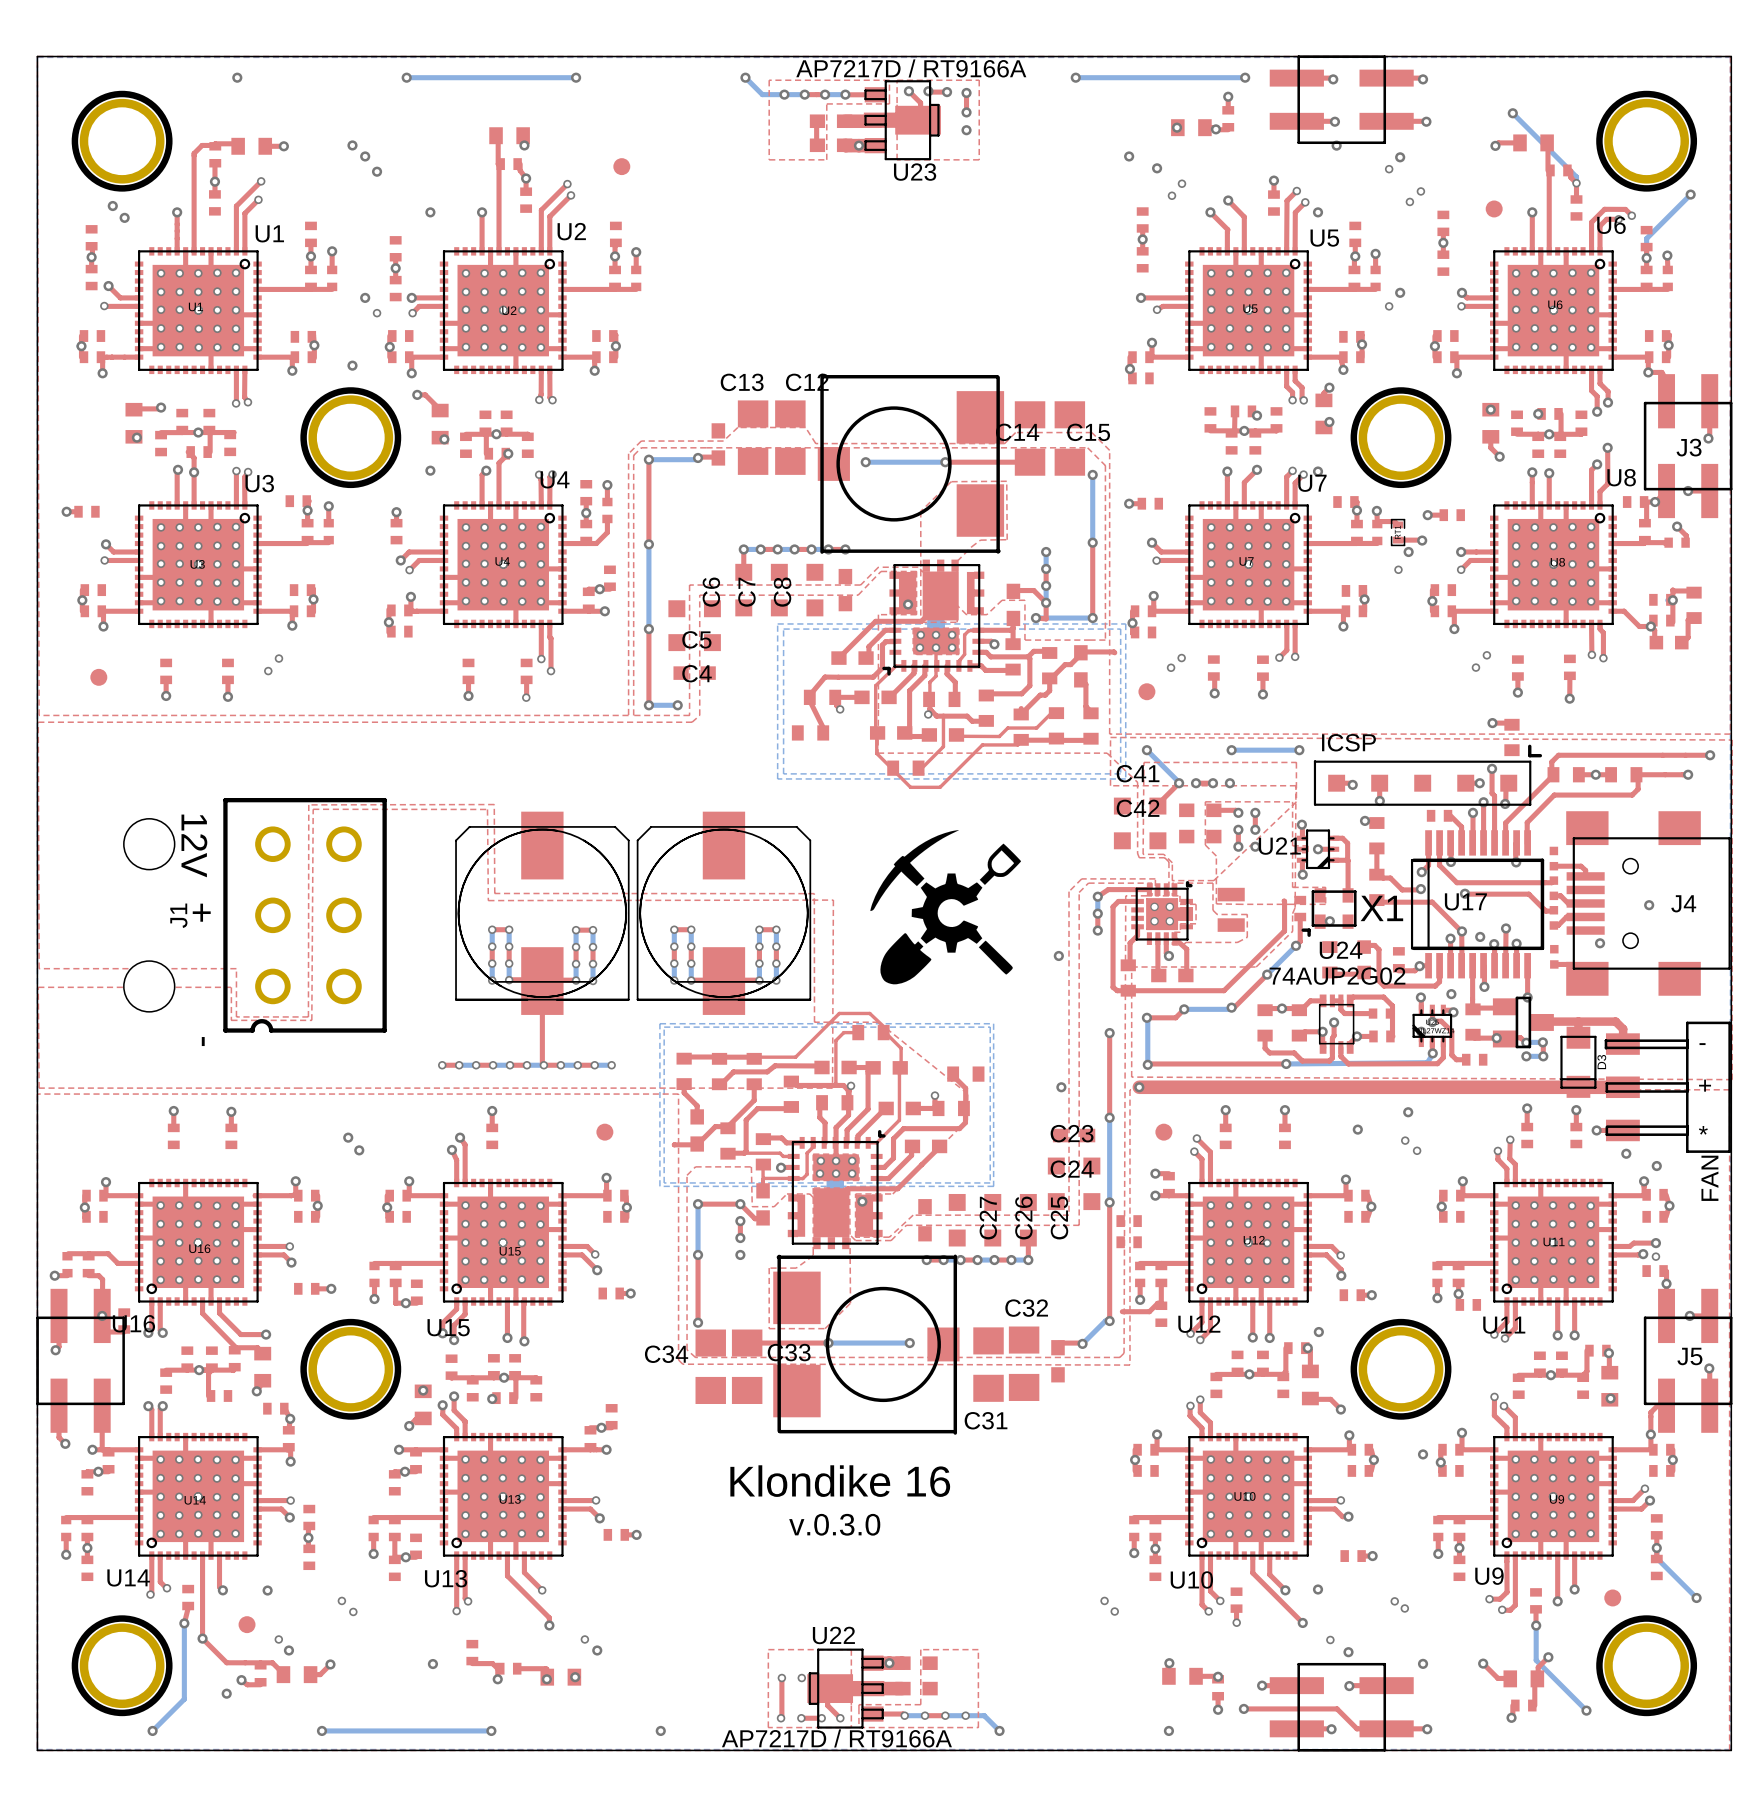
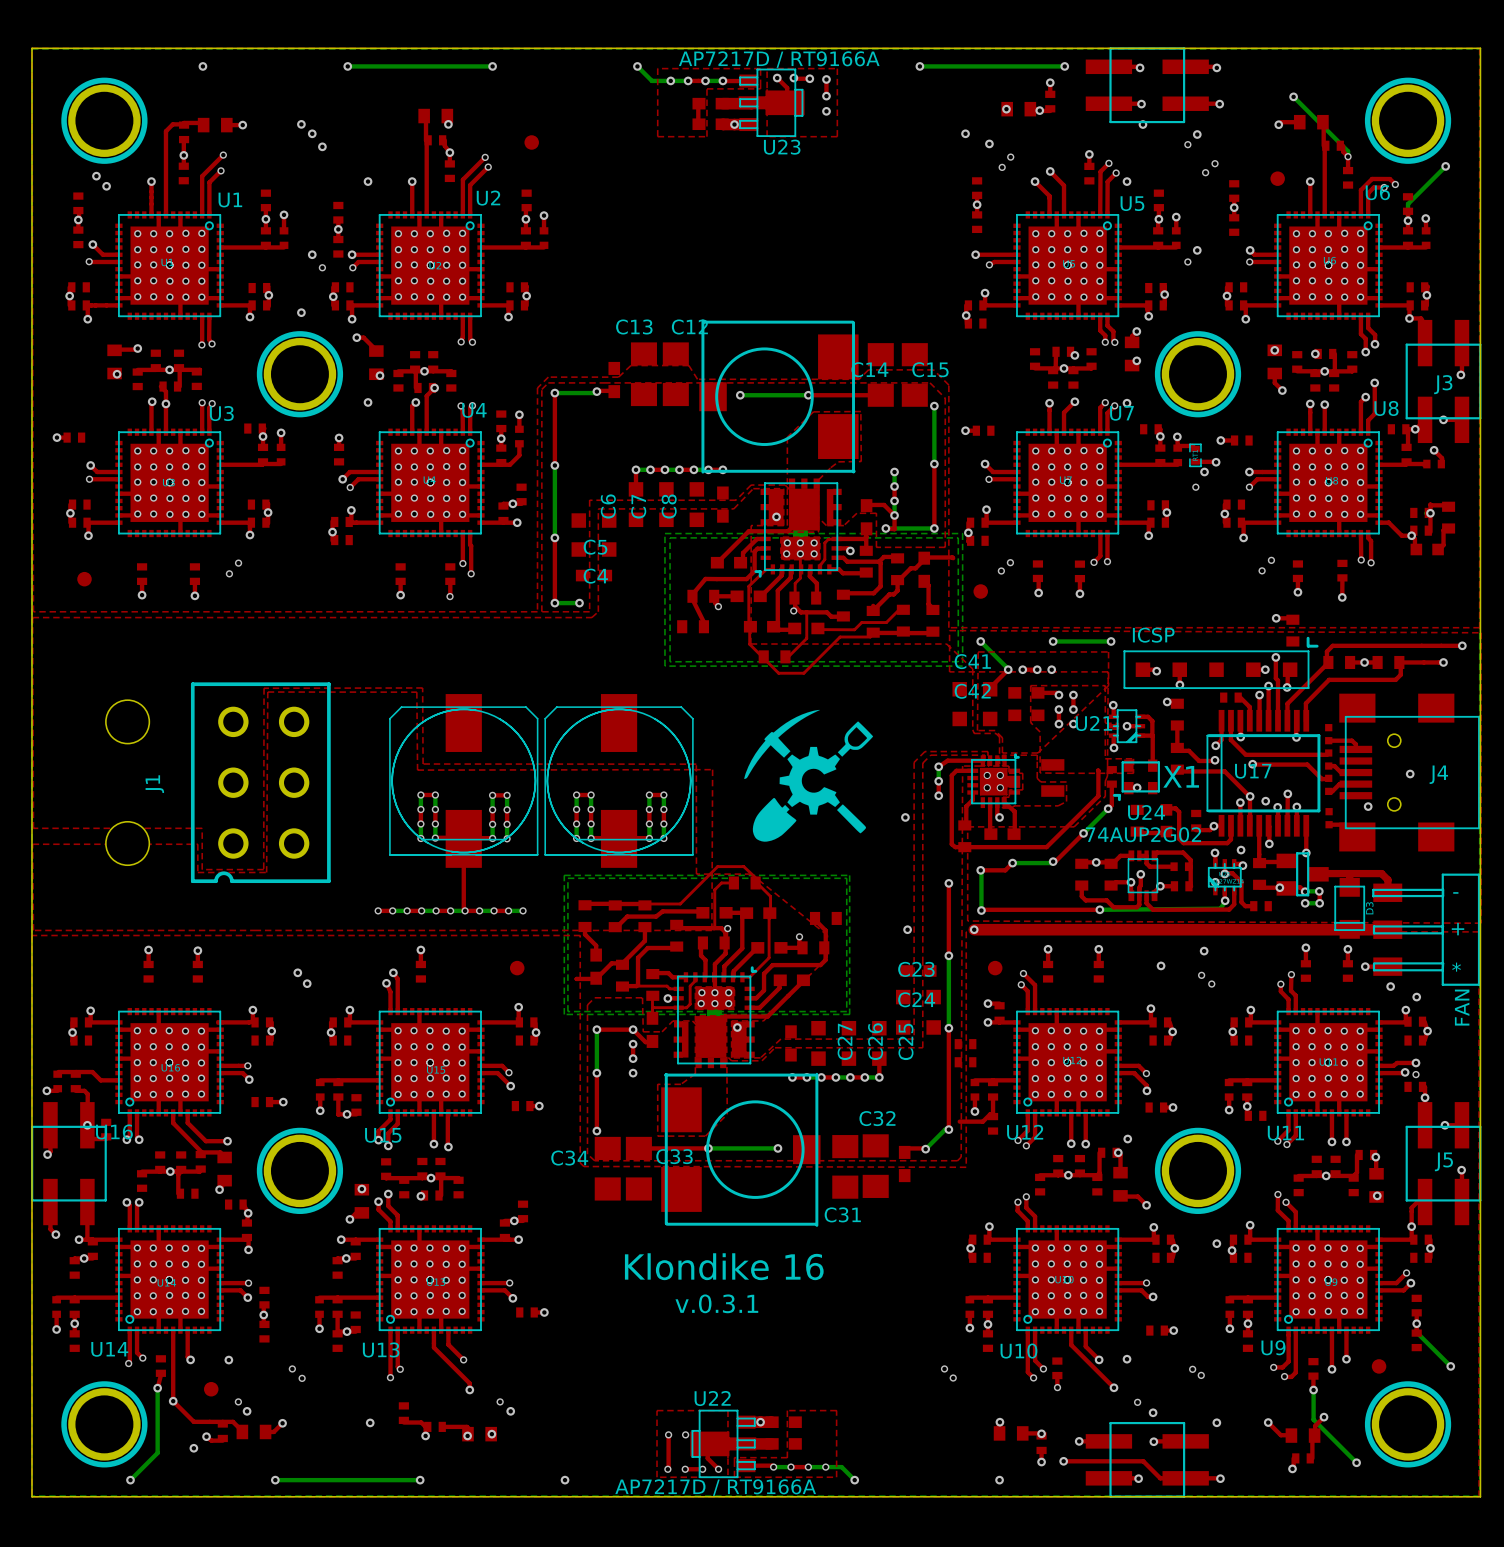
text: 12V (194, 845) -> none
text: + (201, 912) -> none
text: - (203, 1041) -> none
text: v.0.3.0 (834, 1524) -> v.0.3.1 (716, 1303)

